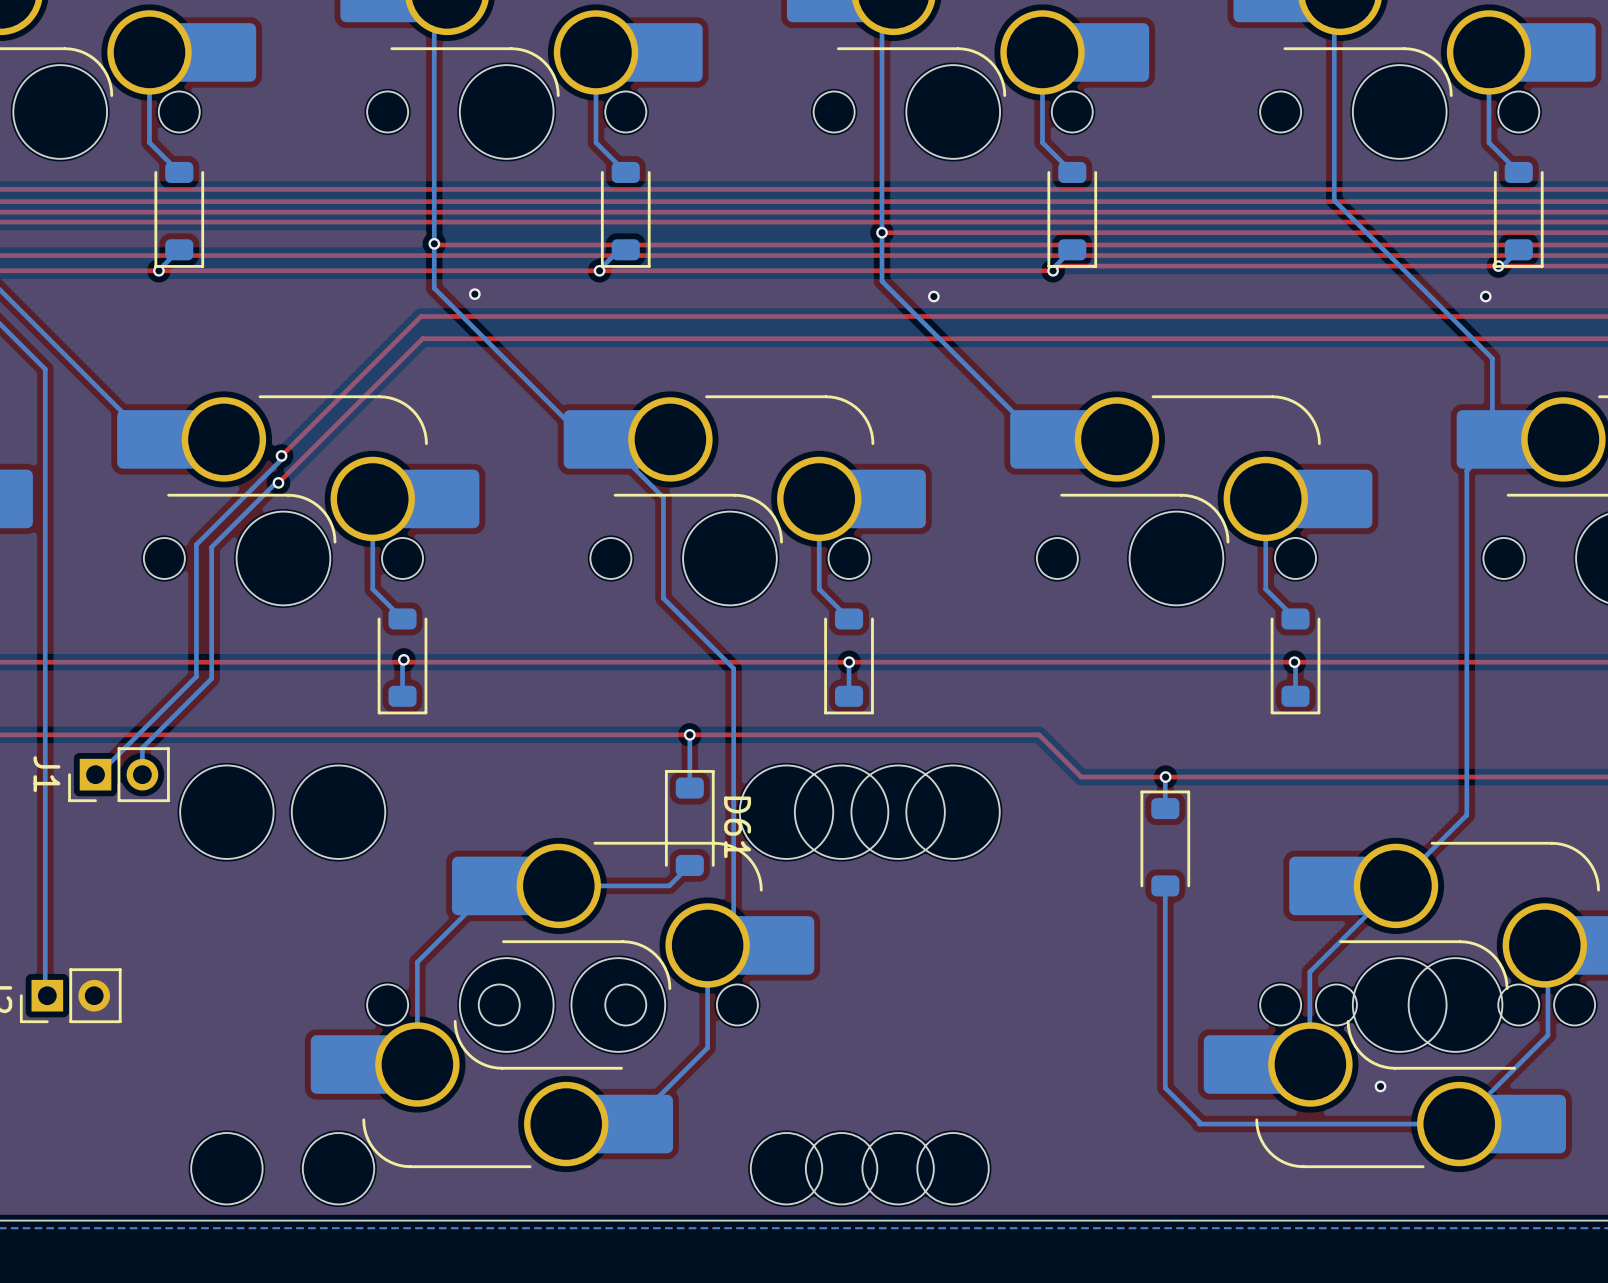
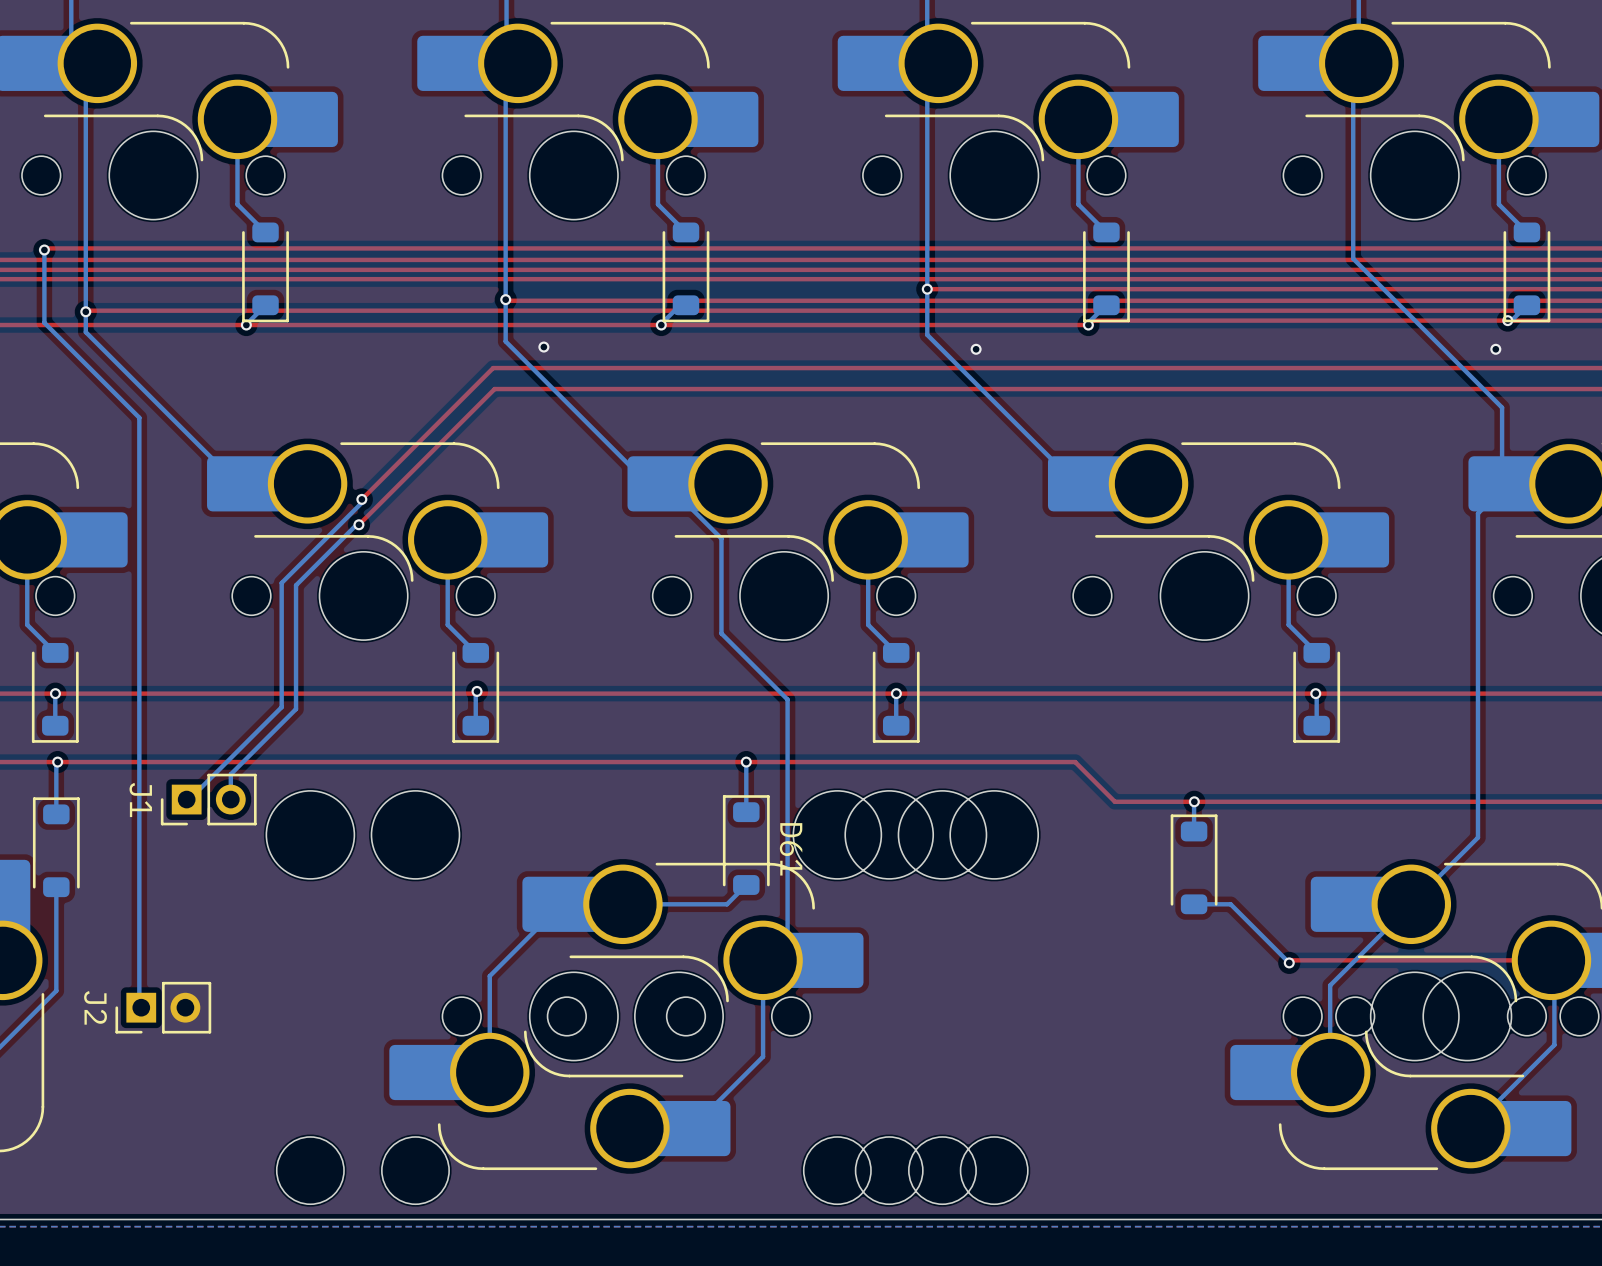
bottom track: (1165, 885) (1165, 1088) (1199, 1124) (1459, 1124) -> (1194, 904) (1230, 904) (1289, 962)
top track: none -> (1551, 960) (1291, 960) (1289, 962)
via: none -> (1289, 962)
via: (1380, 1086) -> none

